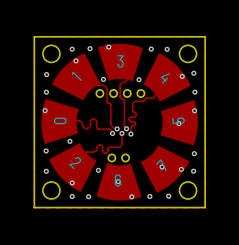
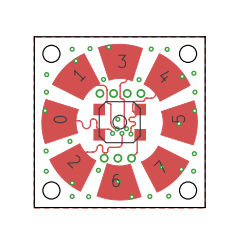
via: none -> (117, 119)
part: none -> (119, 122)
track: none -> (140, 134) (137, 137) (137, 152) (131, 158)
part footprint: [107, 153, 131, 163] -> [99, 153, 137, 163]

